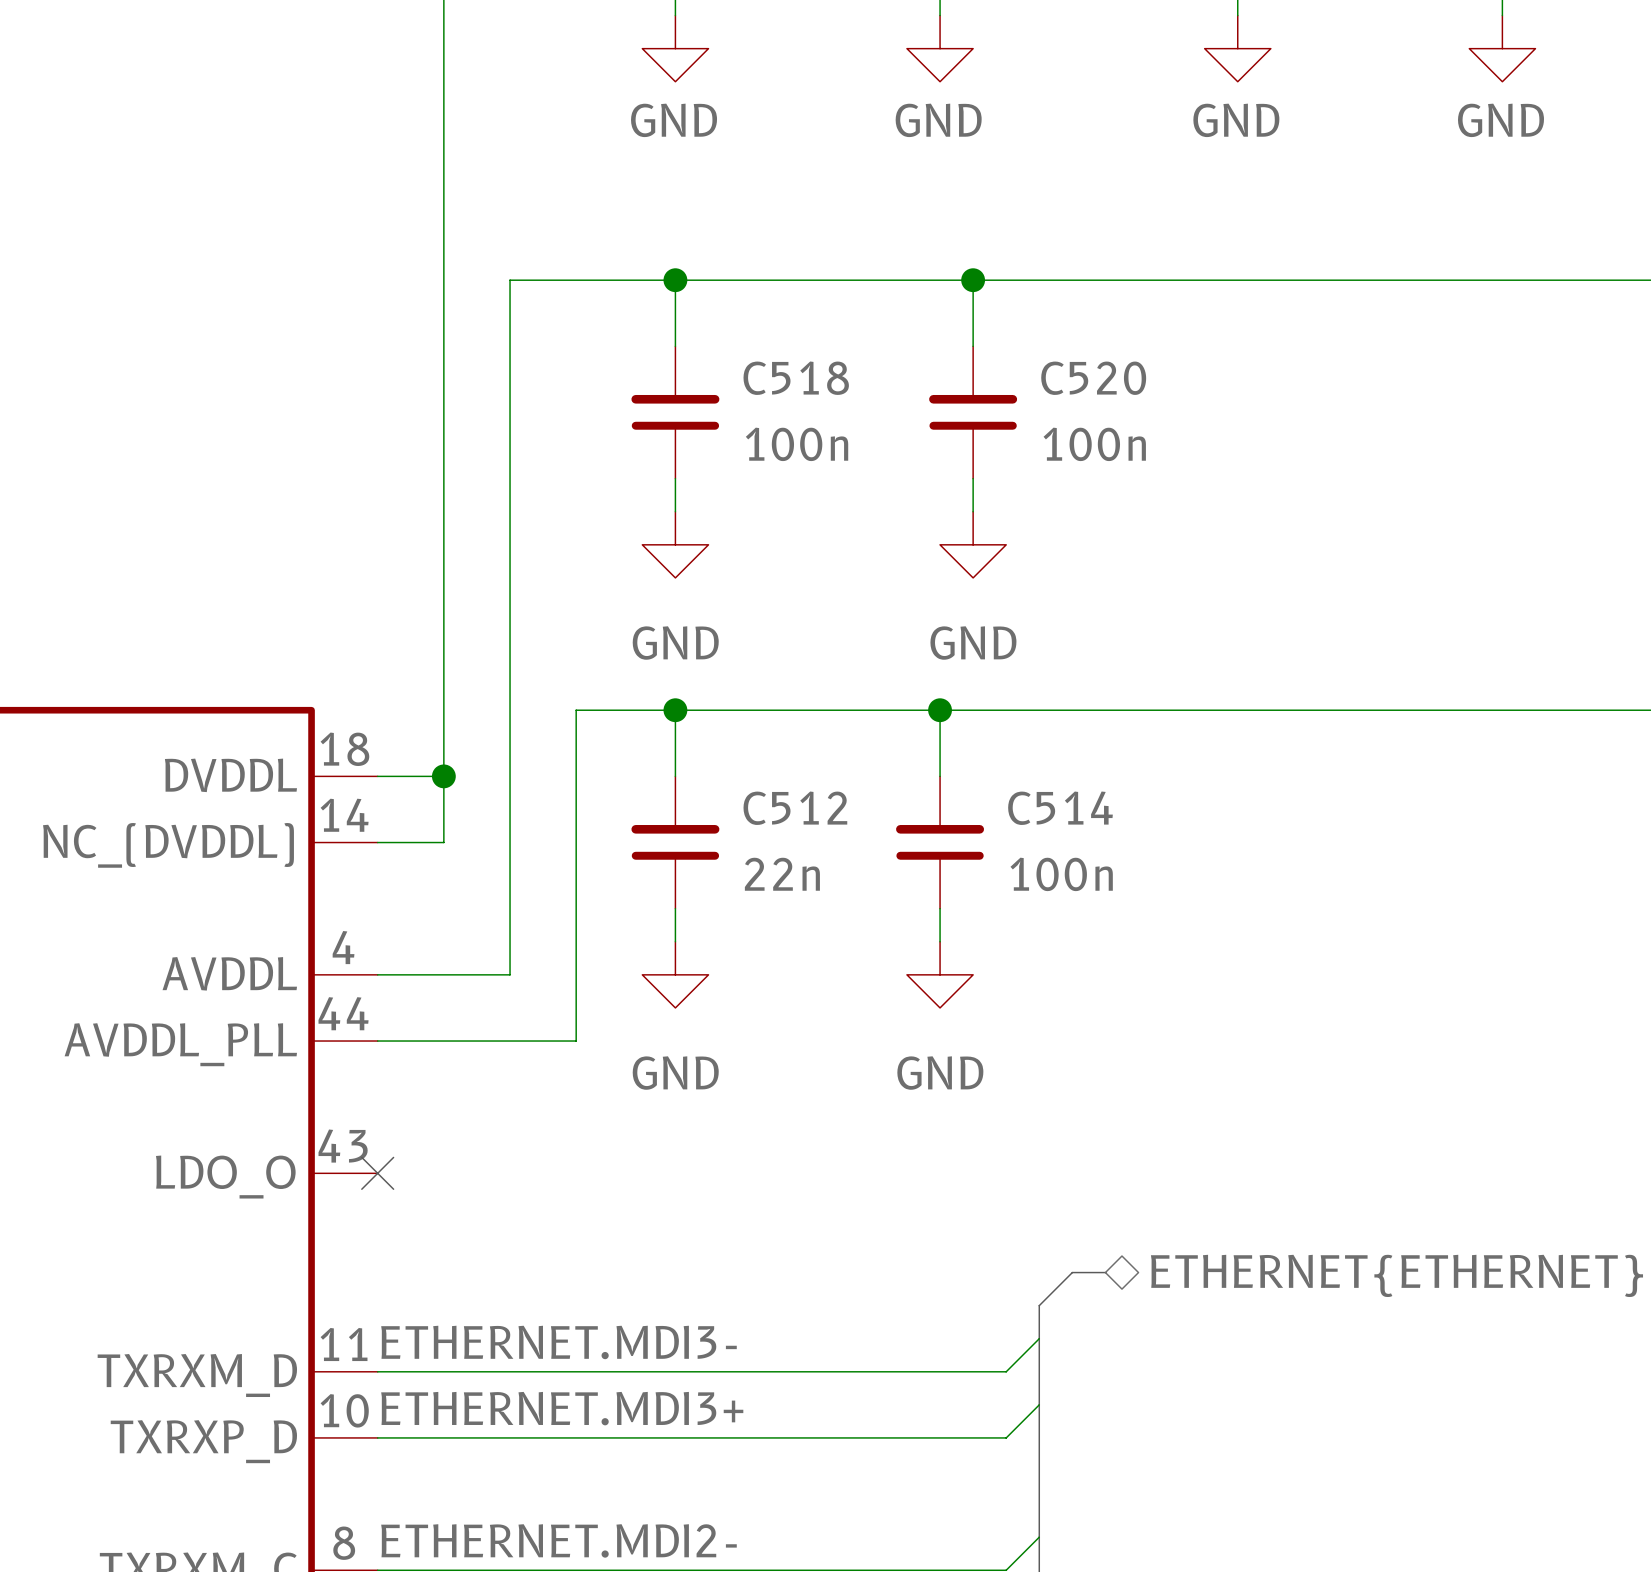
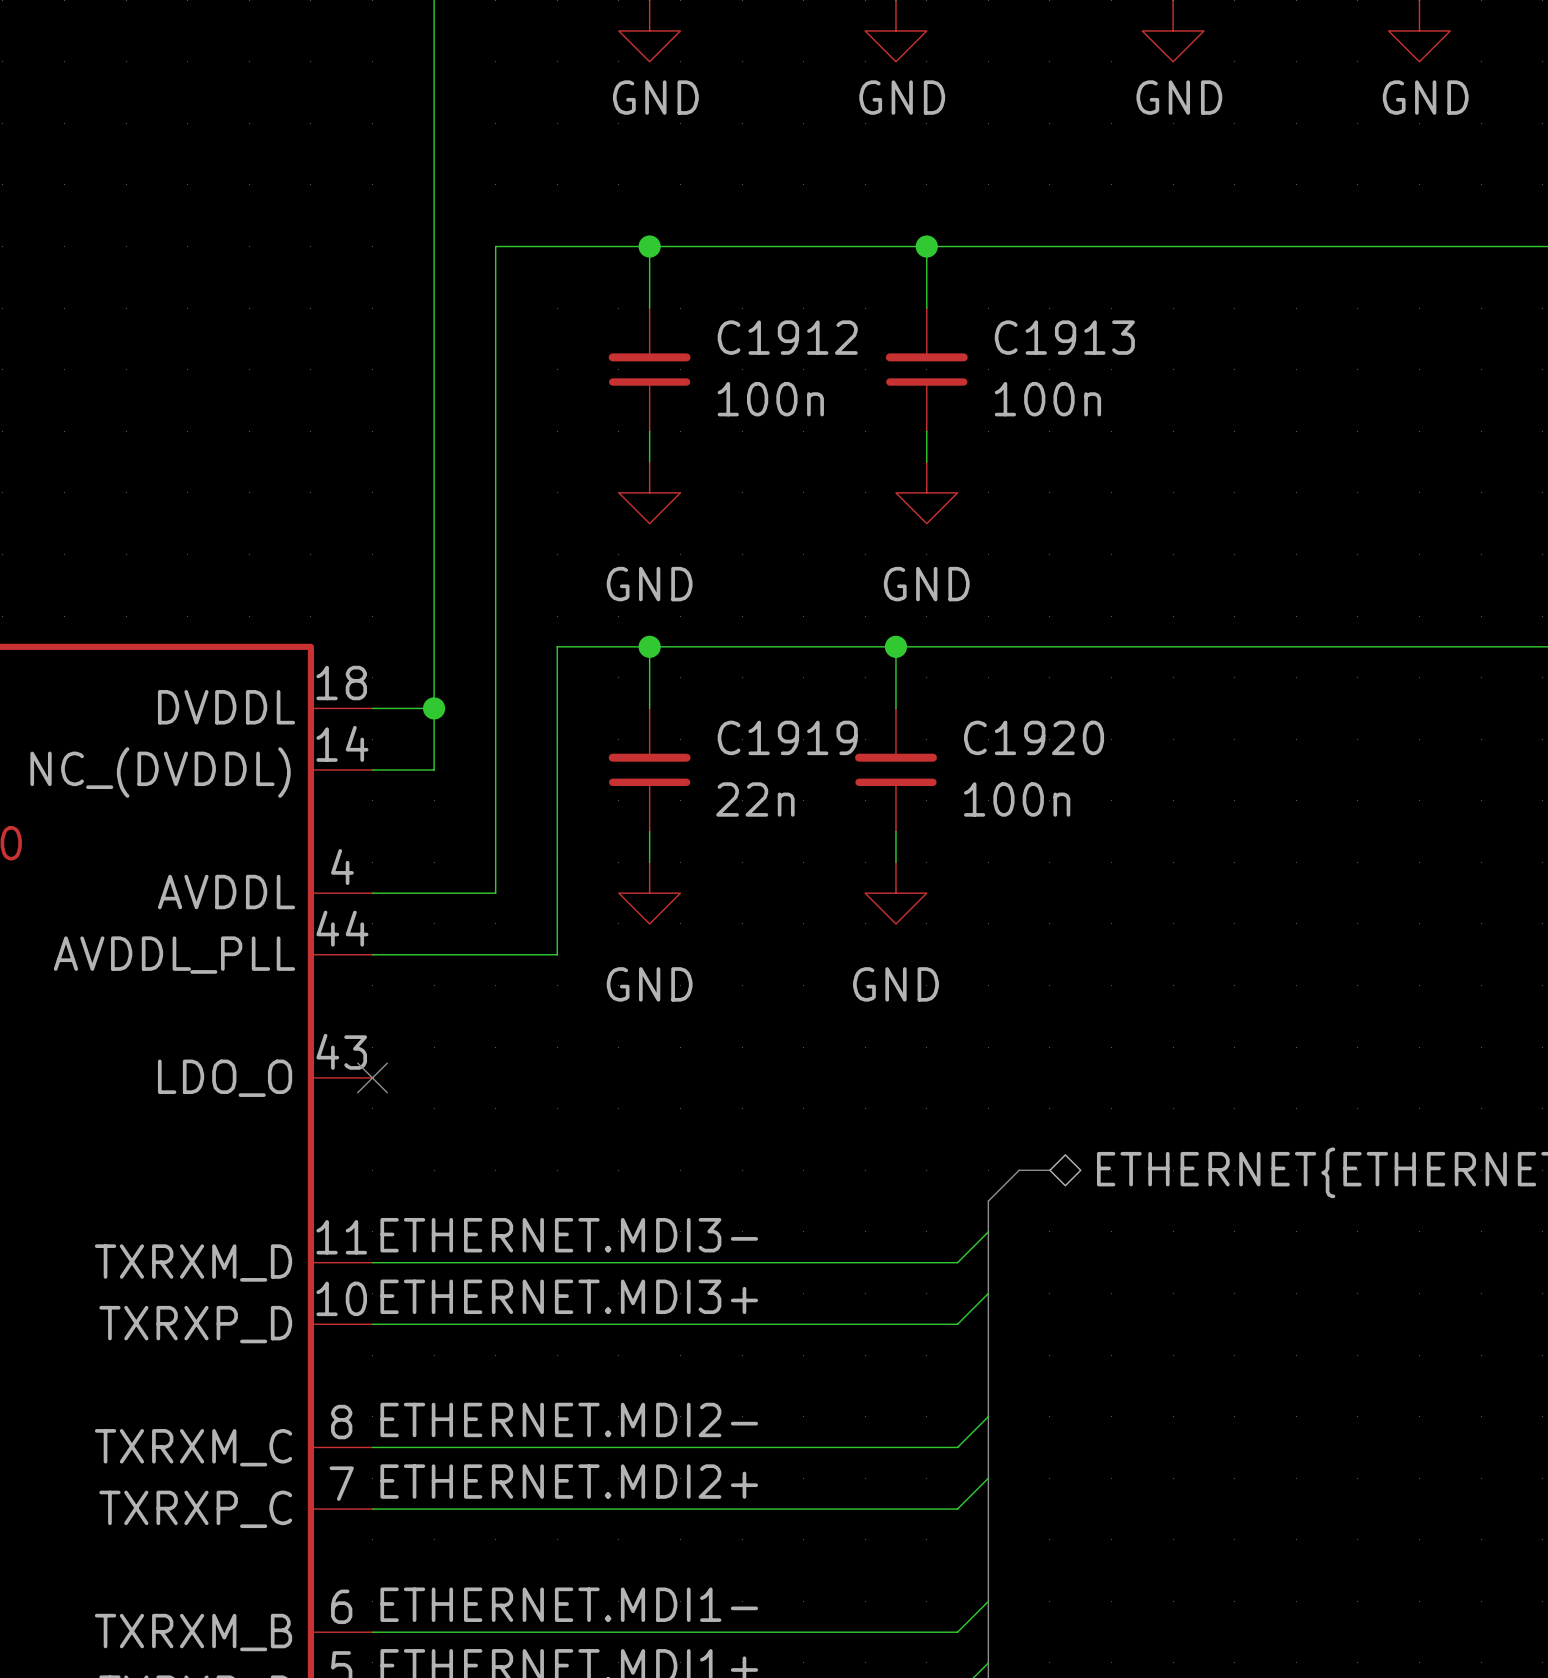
C518 name: C518 (796, 378) -> C1912 (787, 337)
C520 name: C520 (1093, 378) -> C1913 (1064, 337)
C512 name: C512 (795, 808) -> C1919 (787, 737)
C514 name: C514 (1060, 808) -> C1920 (1034, 737)

